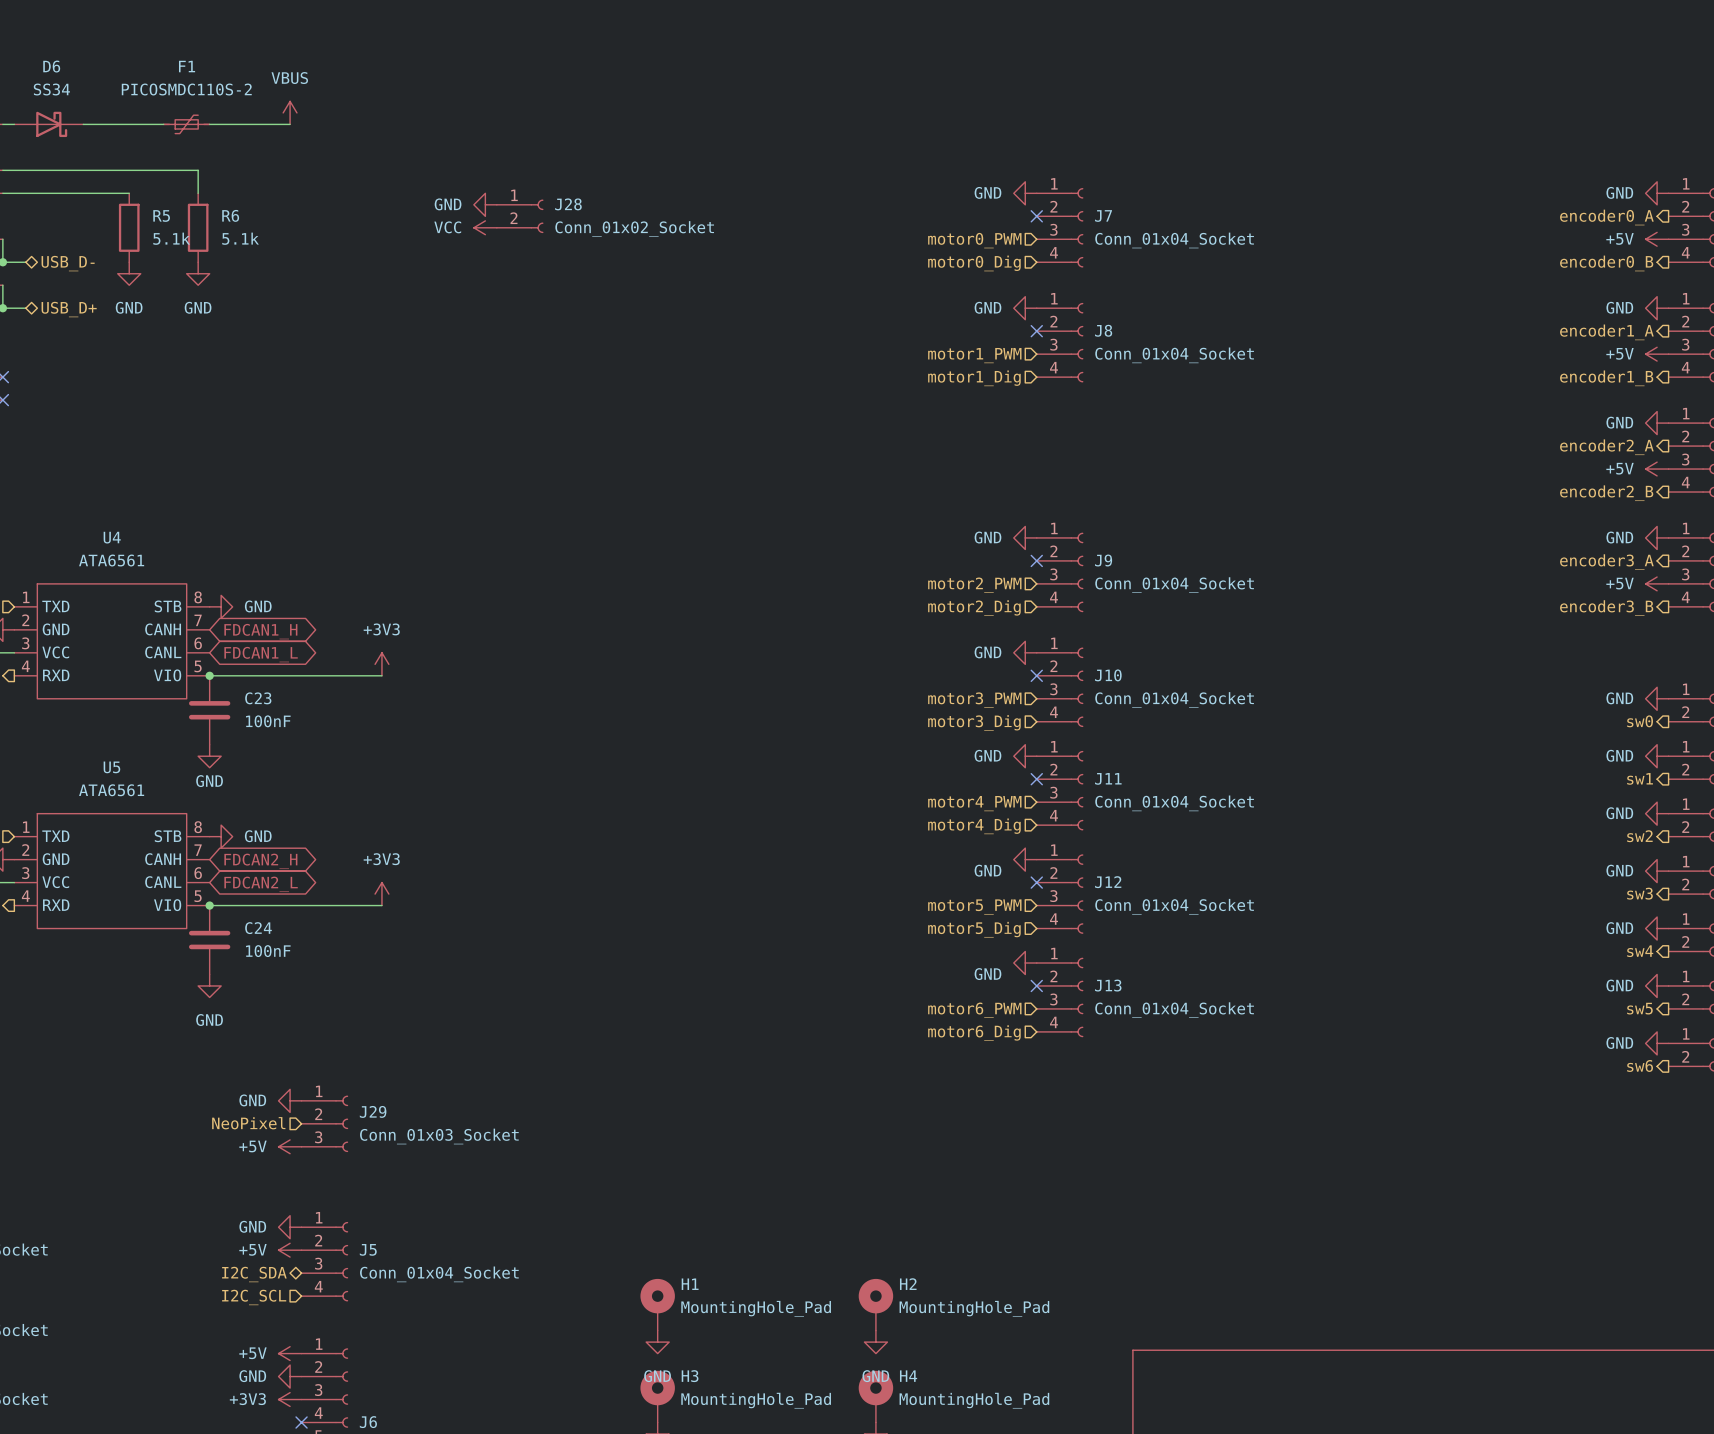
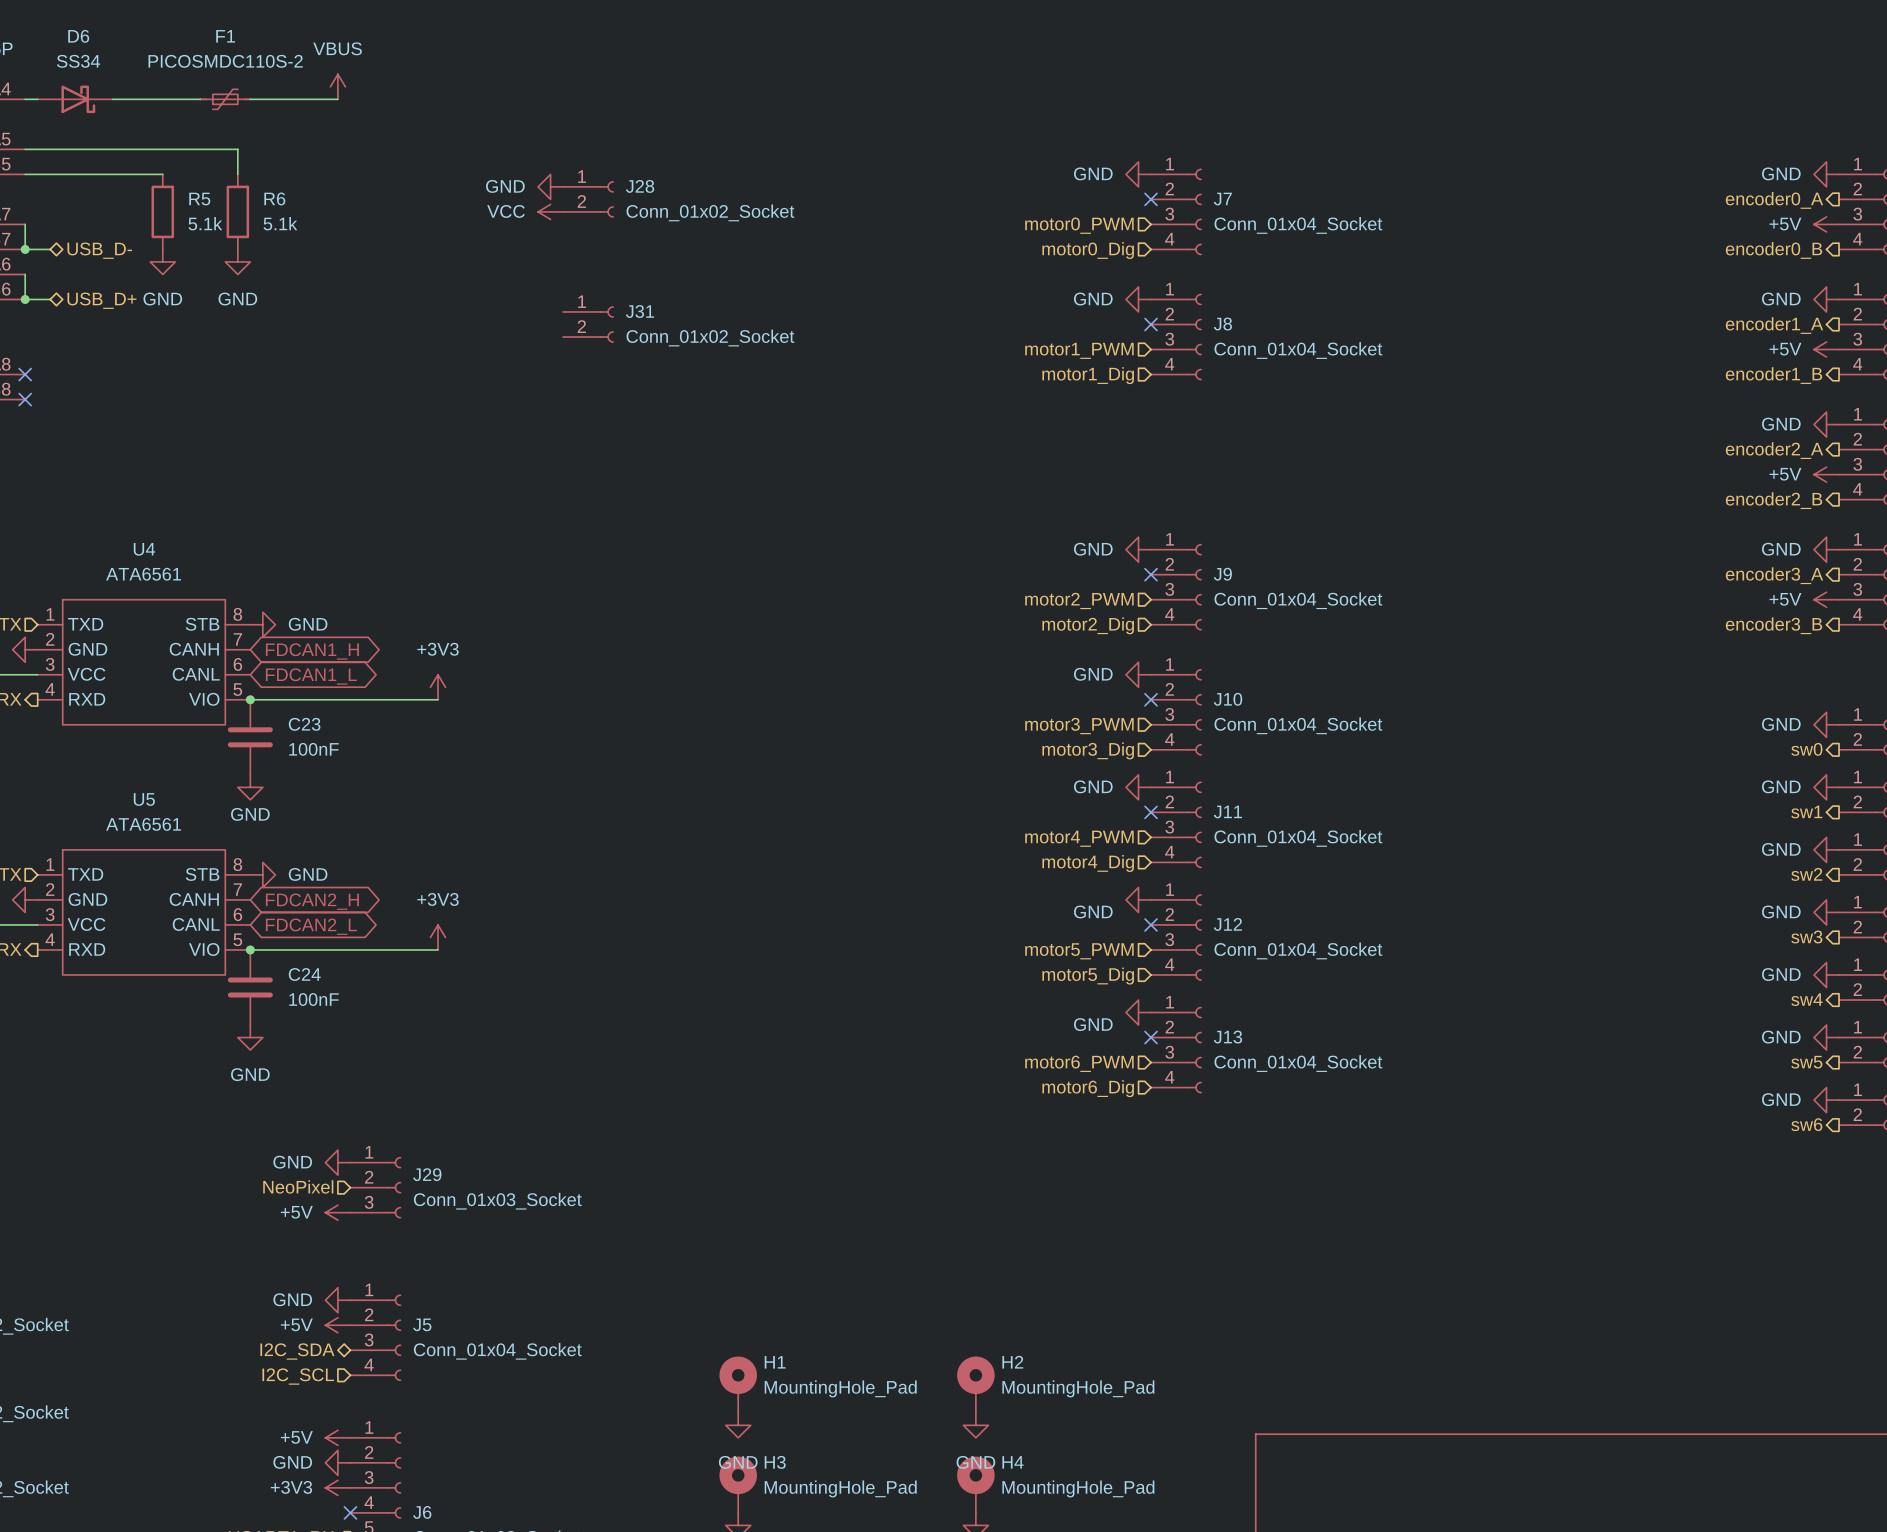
J31: none -> Conn_01x02_Socket (588, 324)

